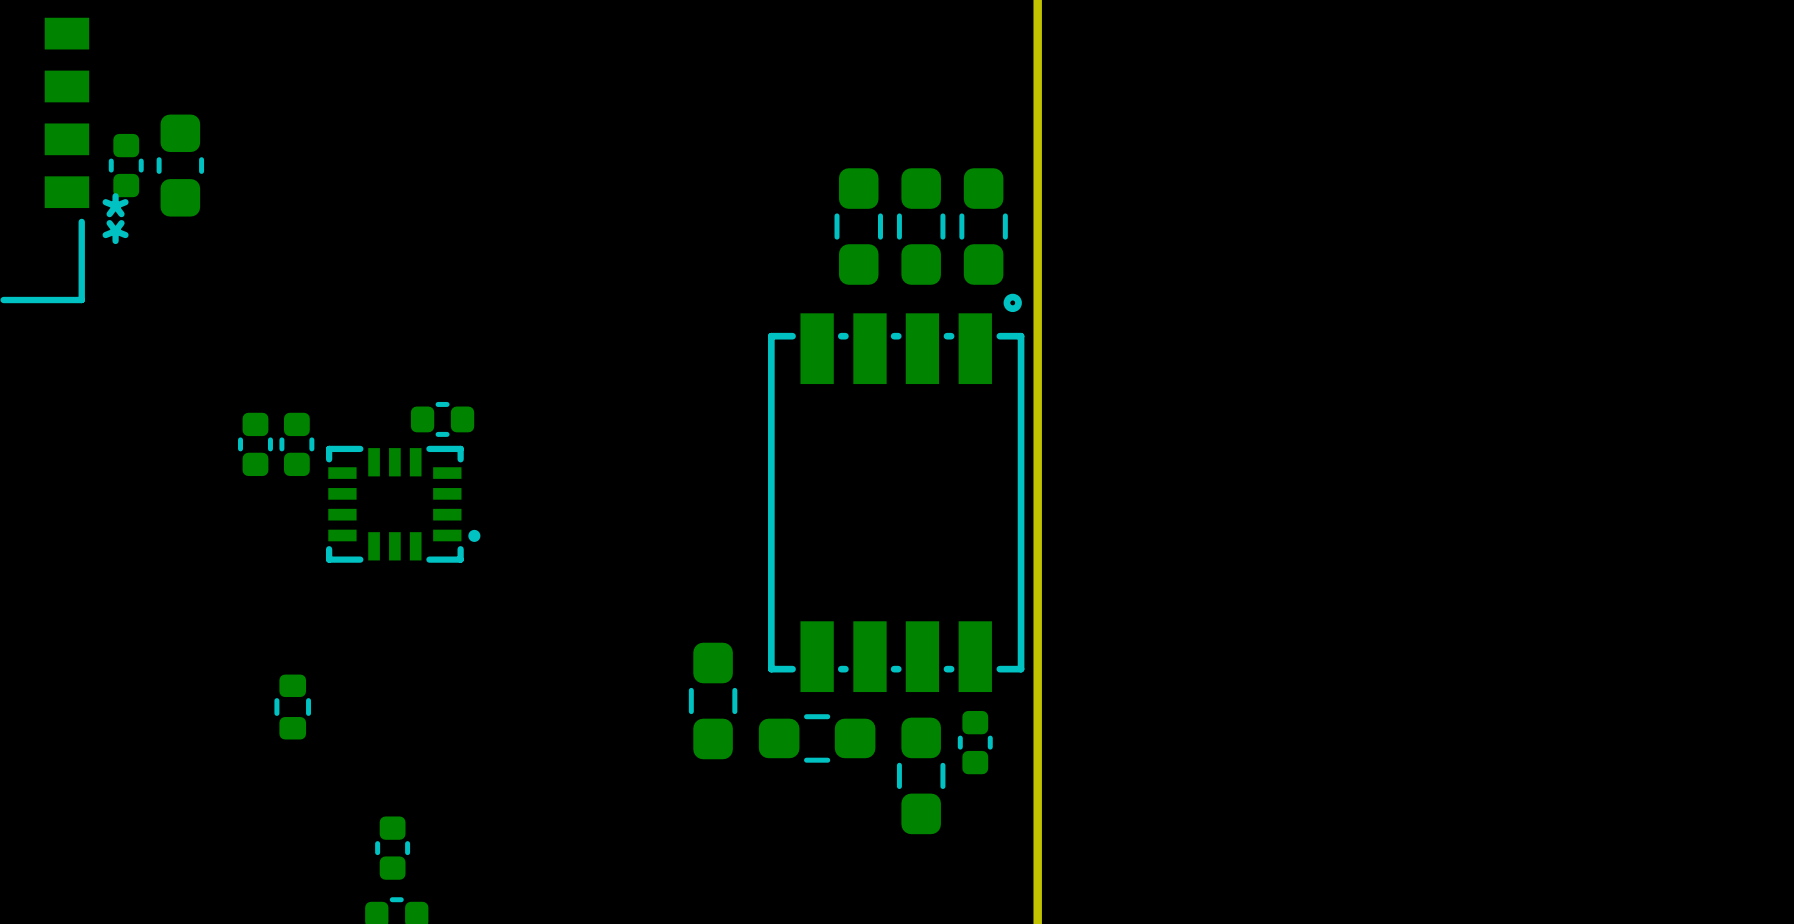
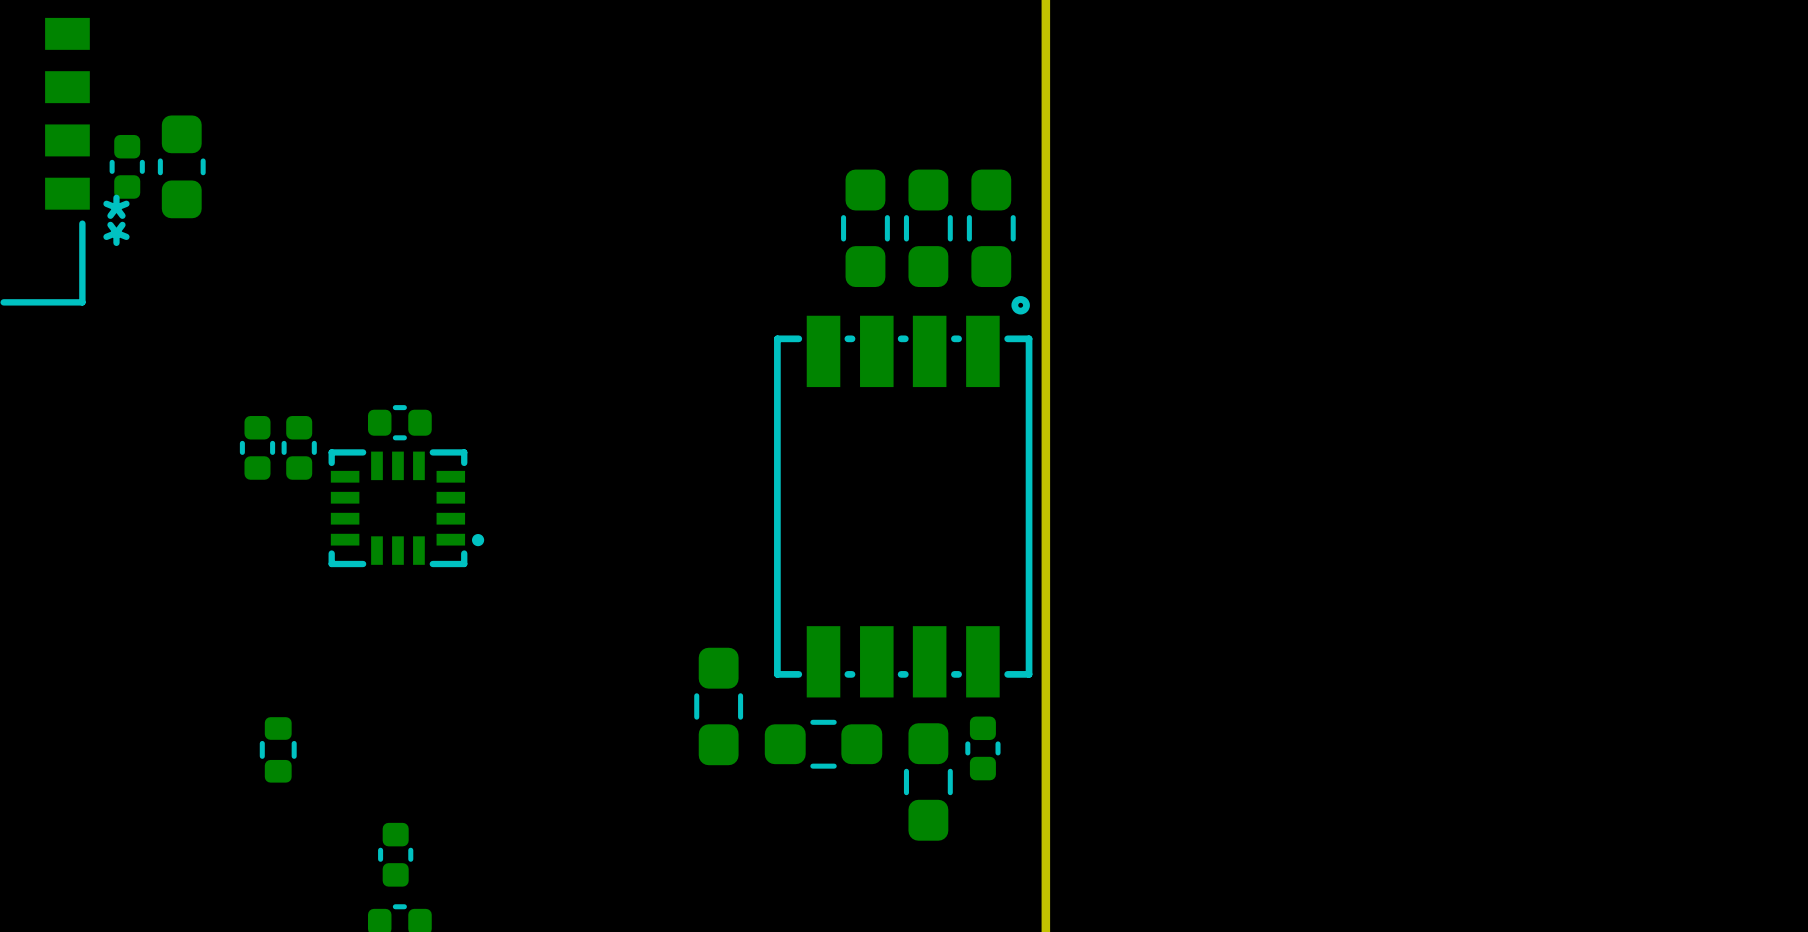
part position: (442, 419) -> (399, 422)
part position: (292, 707) -> (278, 749)

